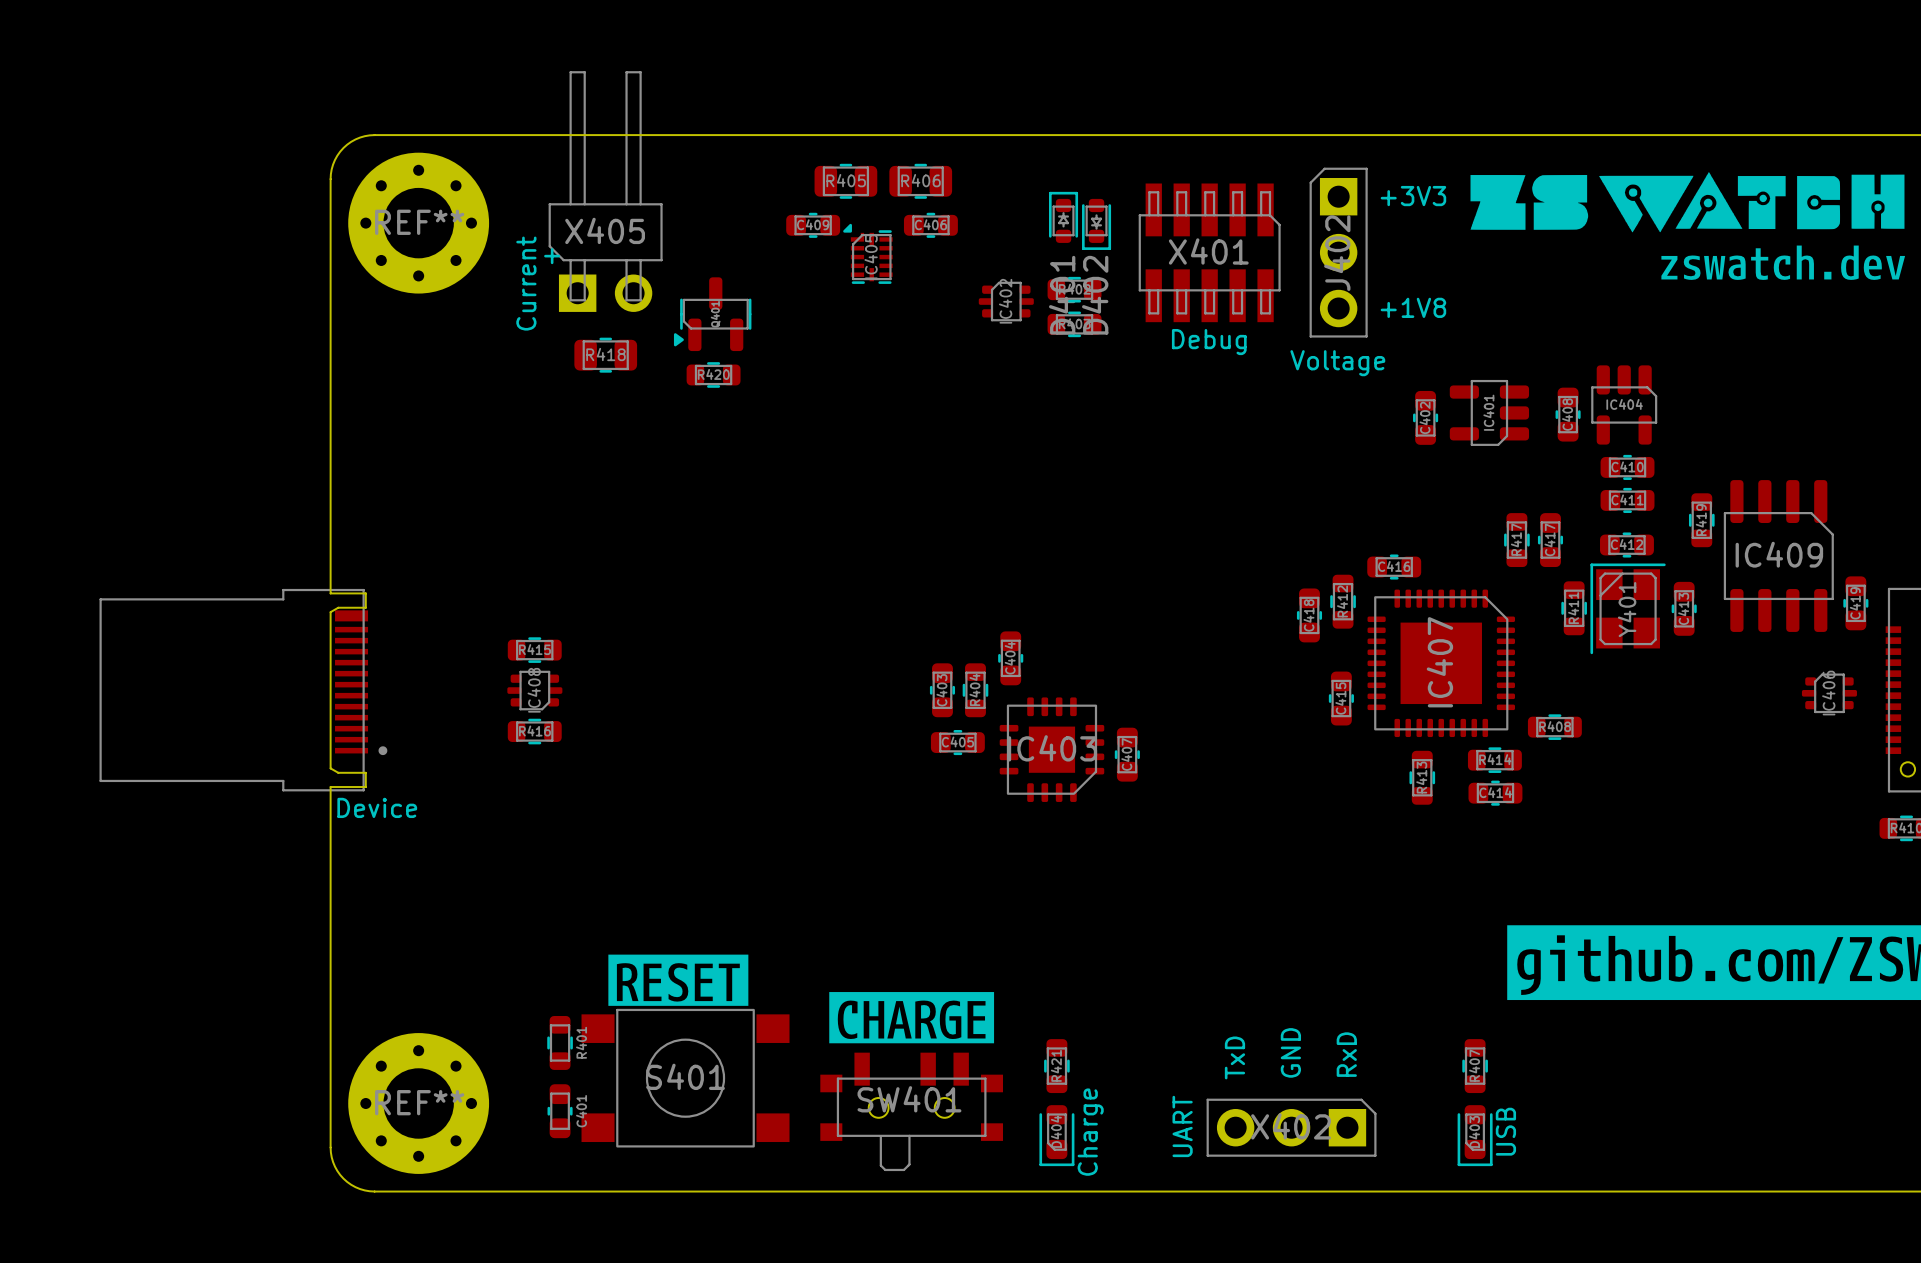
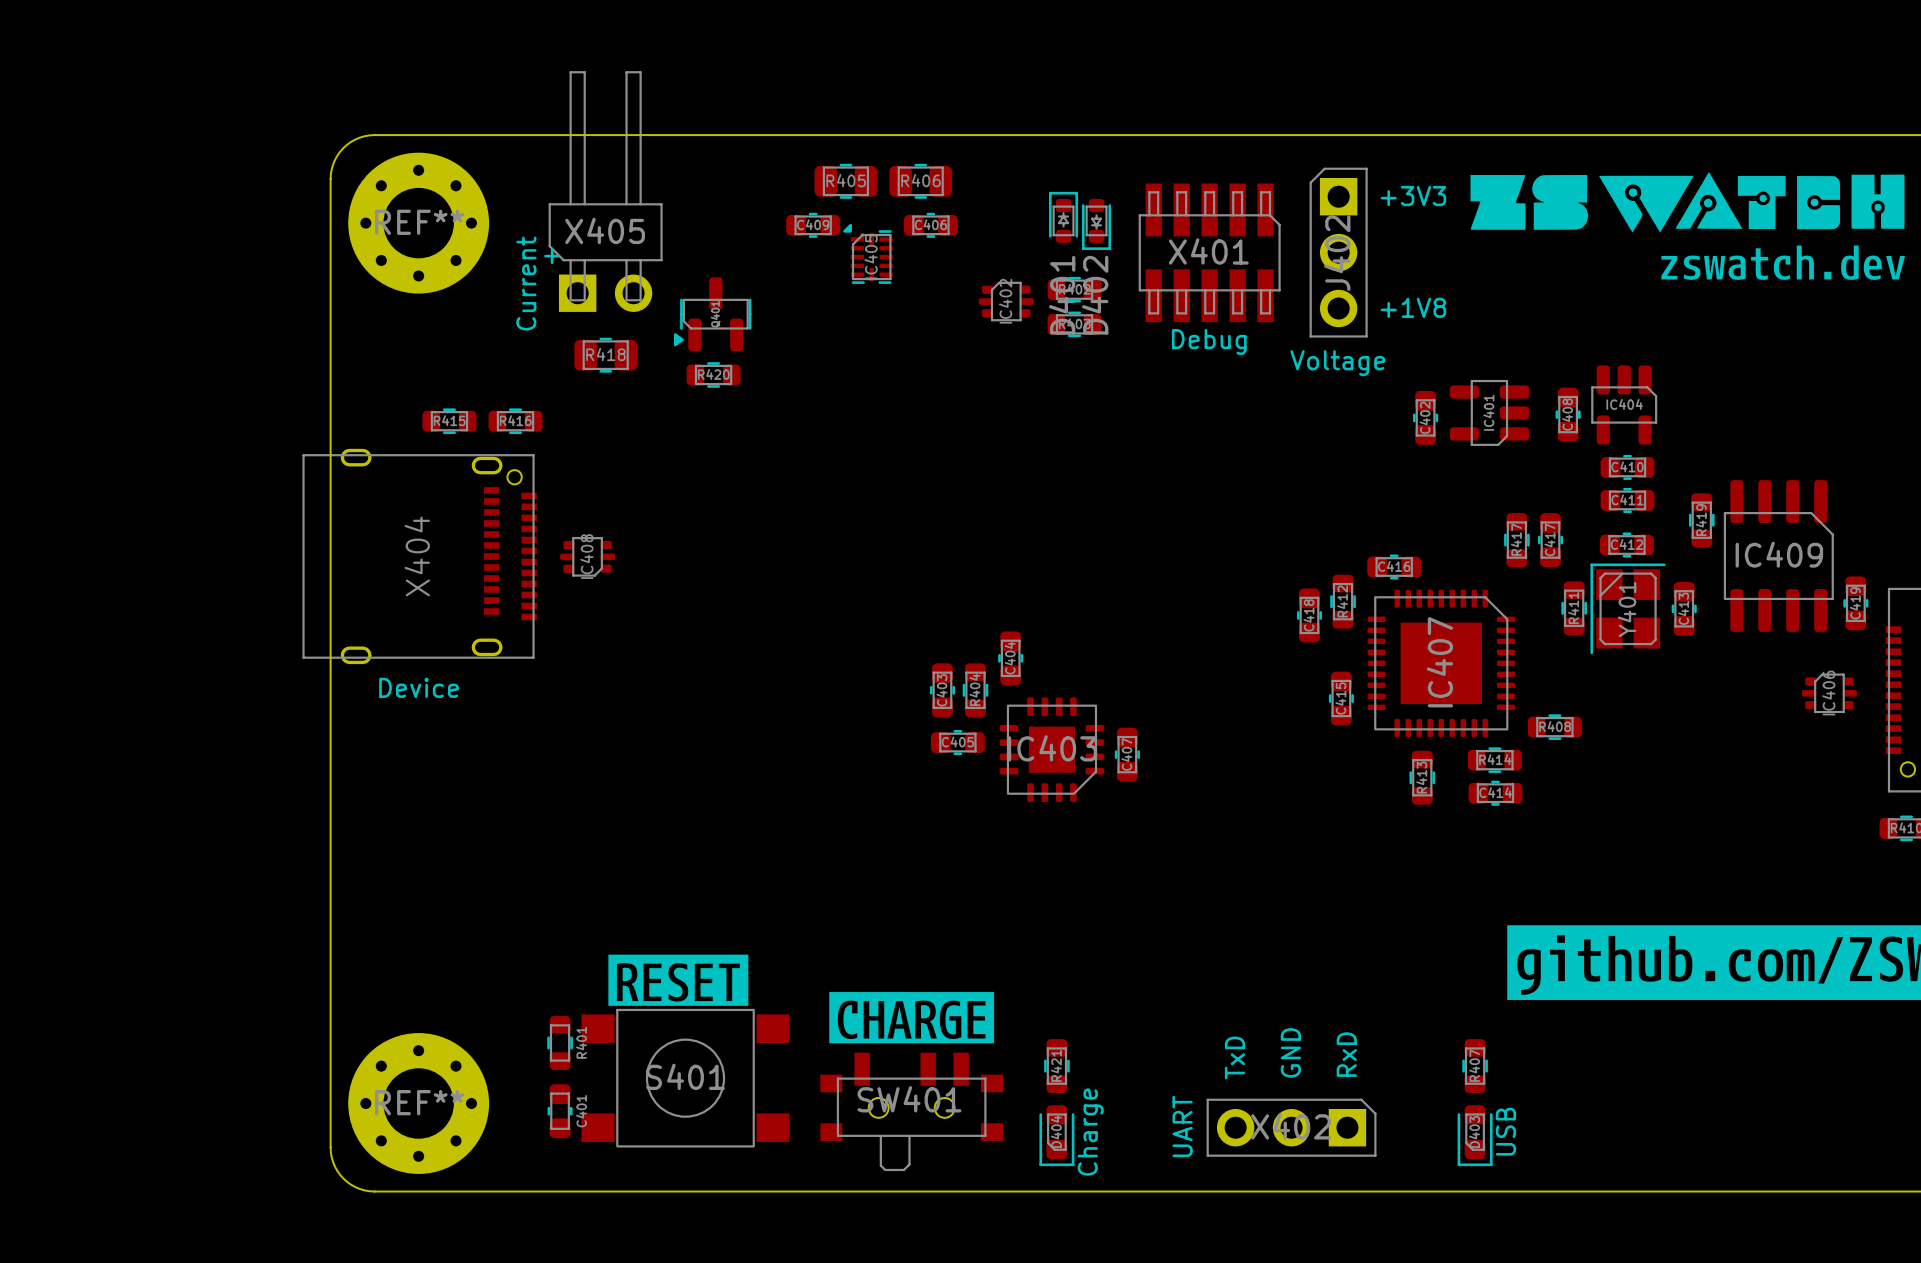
X404: none -> Device (419, 556)
board edge: (330, 593) (365, 593) (365, 607) (338, 607) (330, 612) -> (330, 593) (330, 612)
R415 position: (534, 650) -> (449, 421)
part: Device (243, 690) -> none
IC408 position: (534, 690) -> (587, 556)
R416 position: (534, 731) -> (515, 421)
board edge: (330, 768) (338, 772) (365, 772) (365, 787) (330, 787) -> (330, 768) (330, 787)

